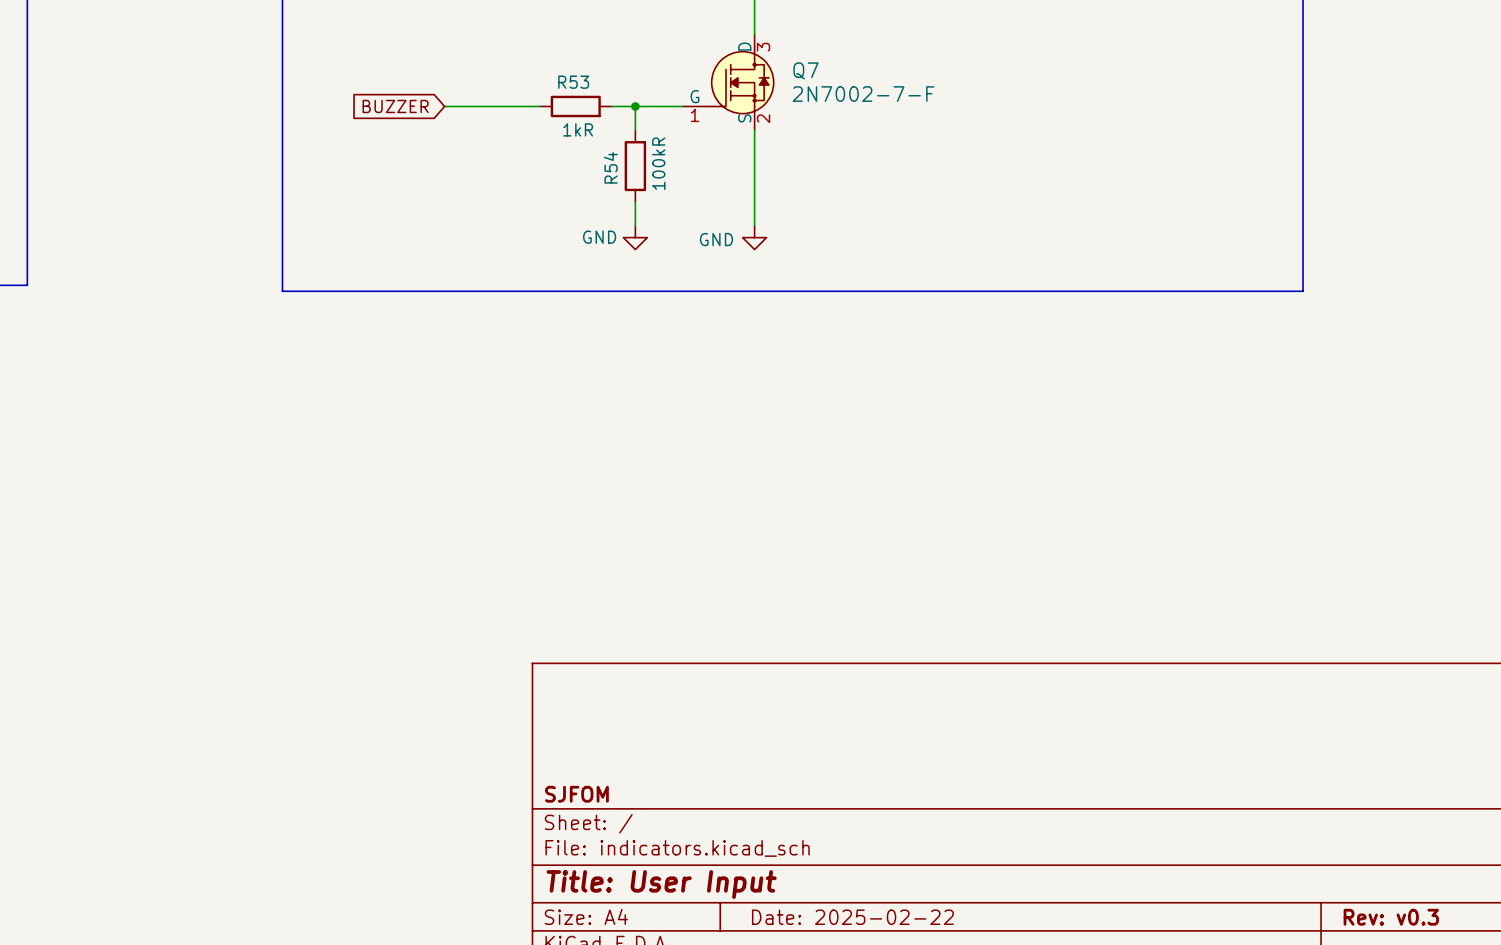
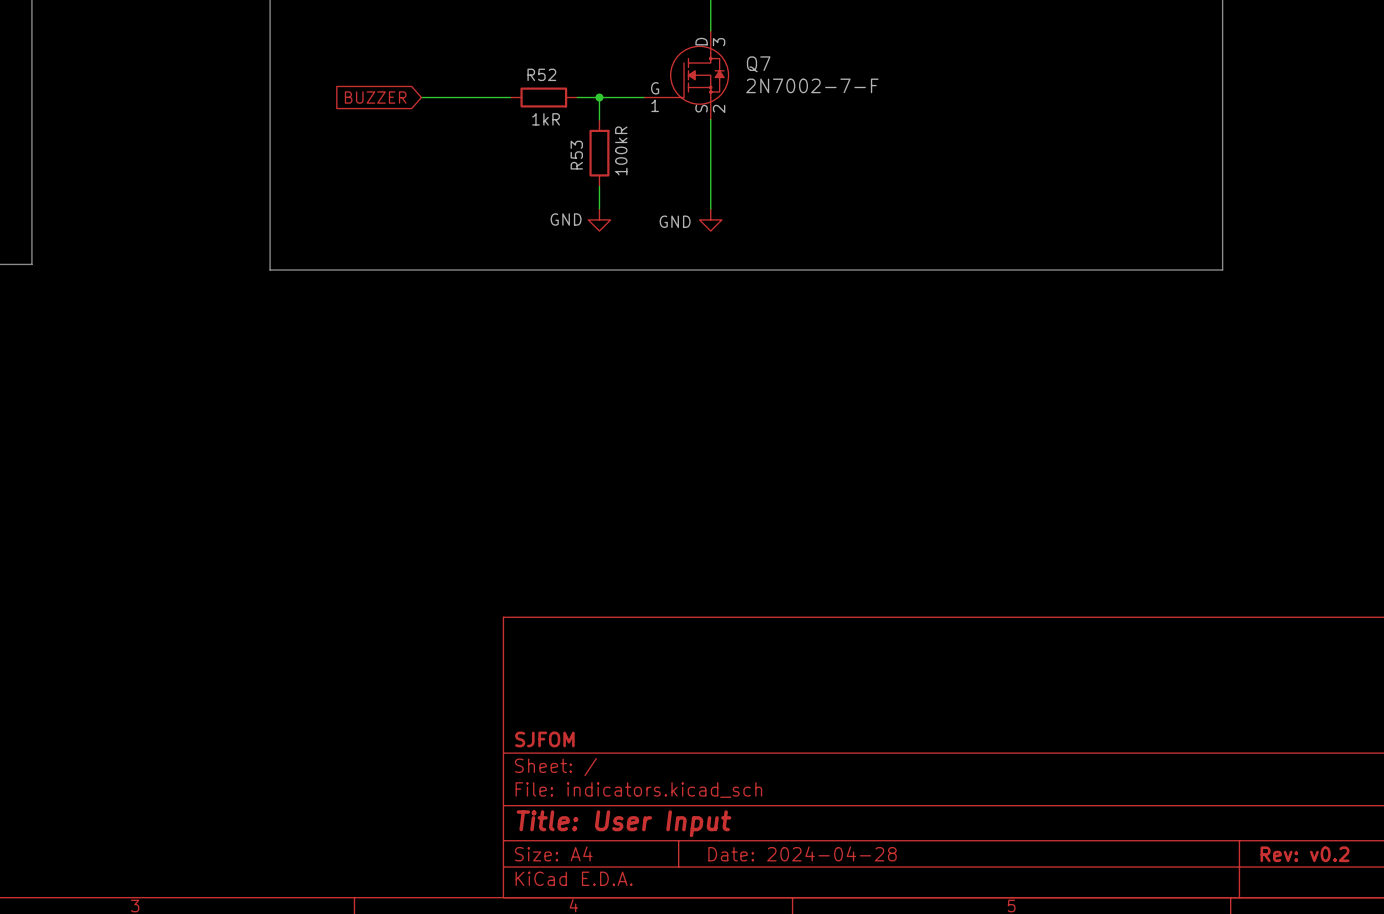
R53 name: R53 (573, 82) -> R52 (541, 74)
R54 name: R54 (610, 167) -> R53 (576, 155)
title block: Date: 2025-02-22 (852, 917) -> Date: 2024-04-28 (802, 853)
title block: Rev: v0.3 (1391, 917) -> Rev: v0.2 (1305, 854)

